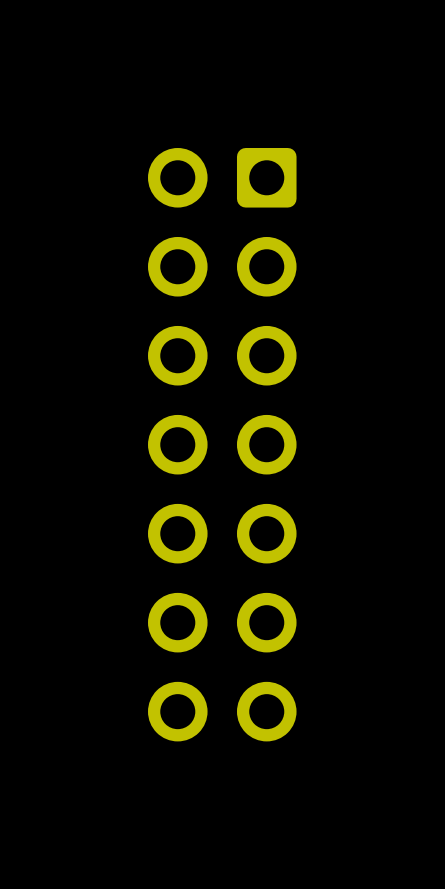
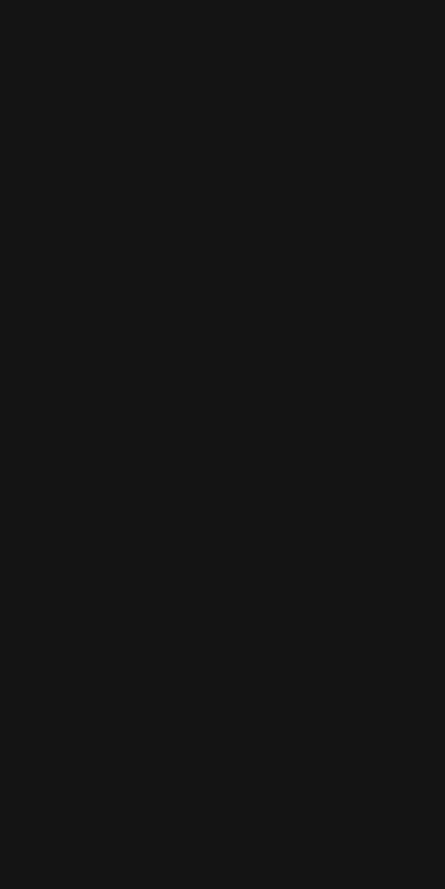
part: (222, 444) -> none

